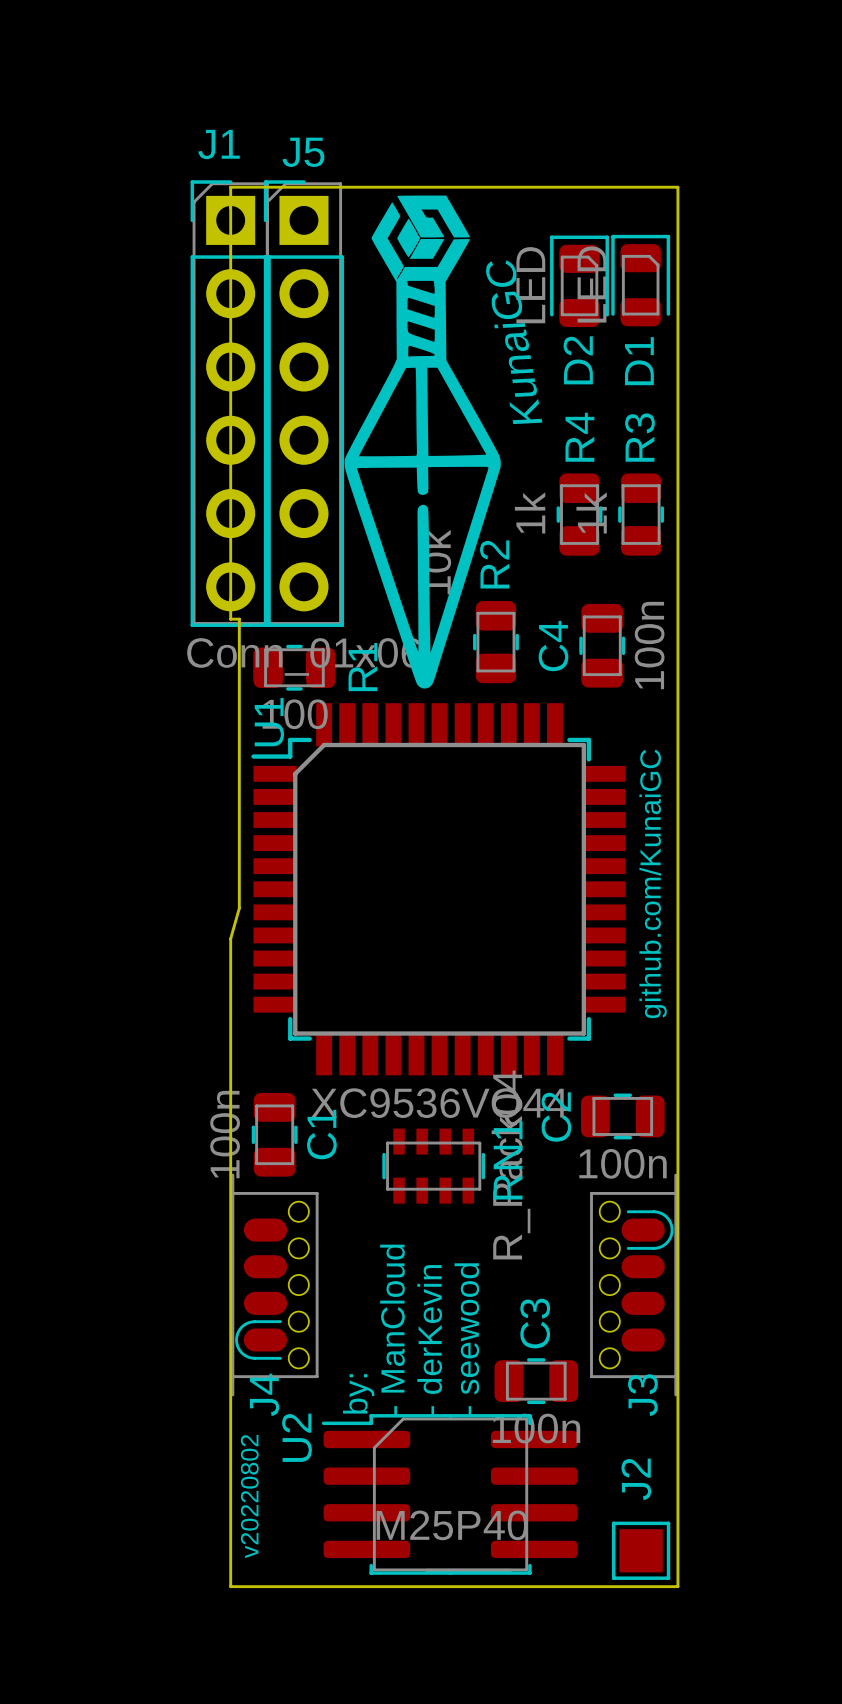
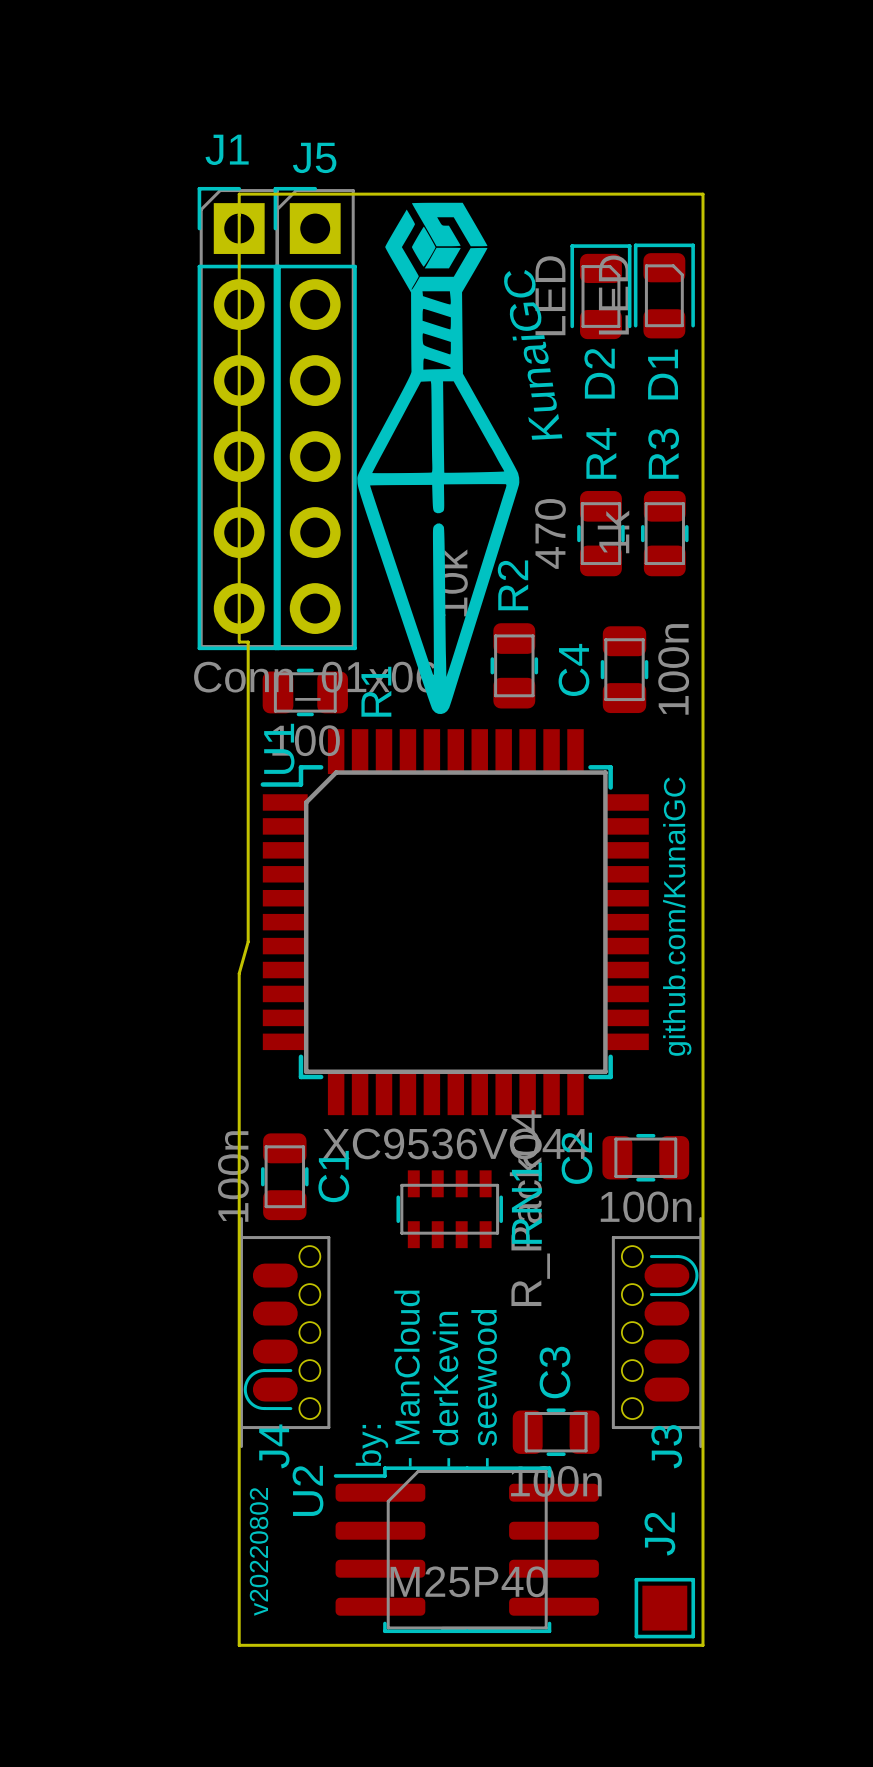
R4 value: 1k (530, 512) -> 470 (550, 533)

